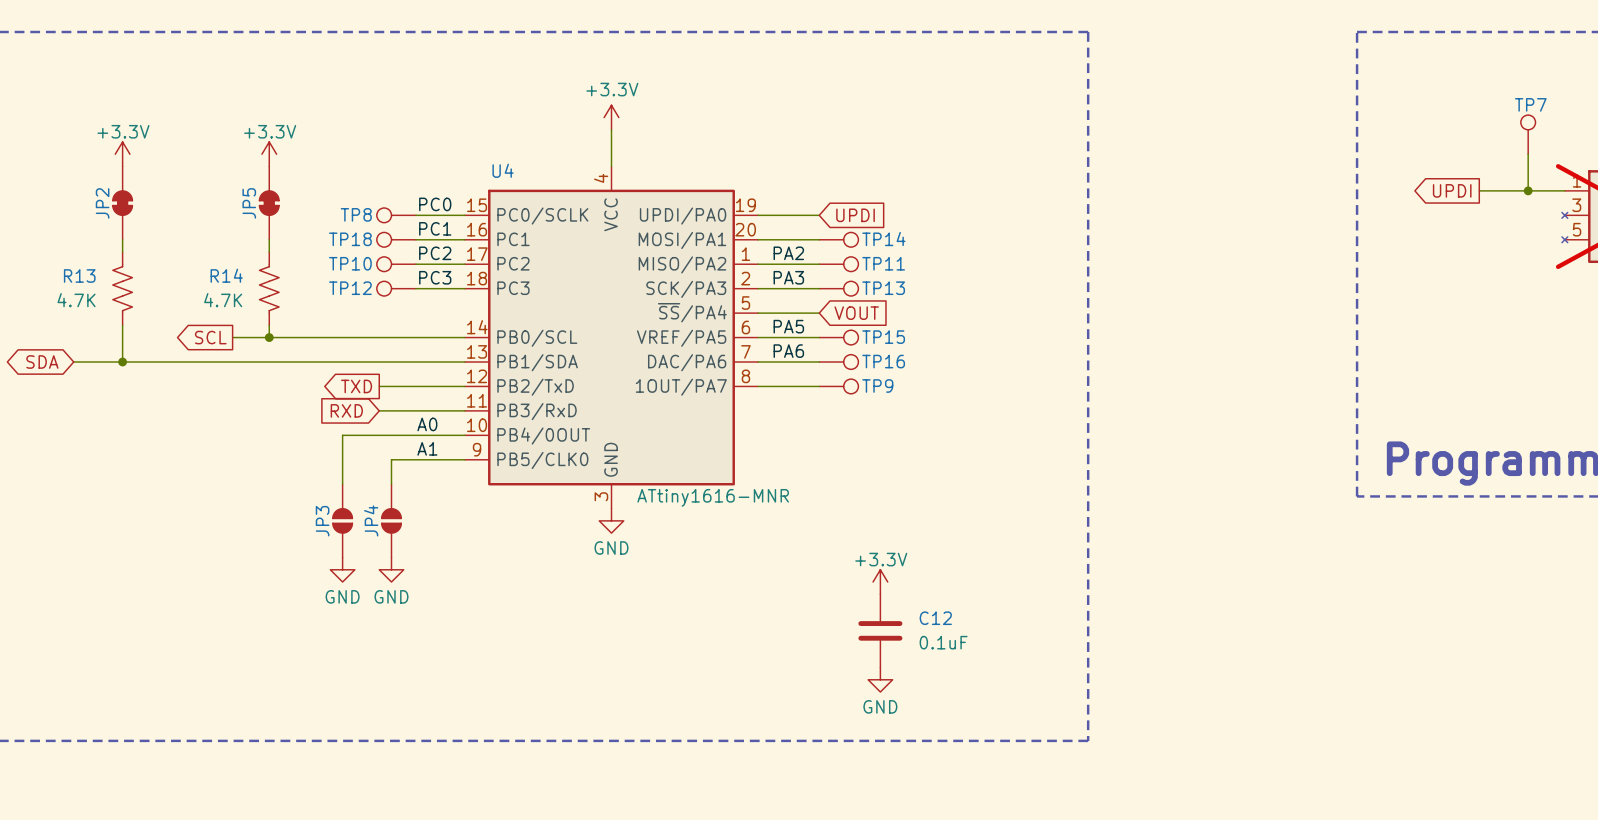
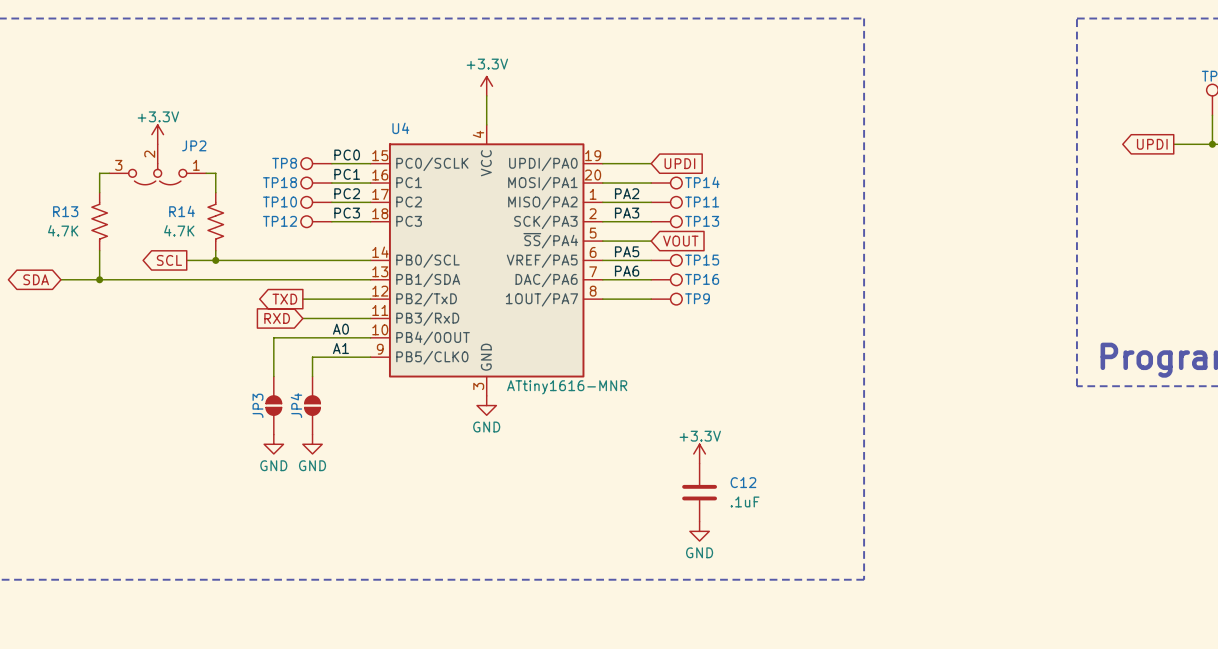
power symbol: +3.3V (122, 154) -> none
power symbol: +3.3V (269, 154) -> none
JP2 symbol: [112, 166, 133, 240] -> [109, 144, 207, 185]
power symbol: none -> +3.3V (157, 134)
JP2 name position: JP2 (102, 203) -> JP2 (194, 145)
JP5: (269, 203) -> none
wire: none -> (109, 173) (99, 173) (99, 183)
wire: none -> (206, 173) (215, 173) (215, 183)
C12 value: 0.1uF (943, 642) -> .1uF (745, 501)

